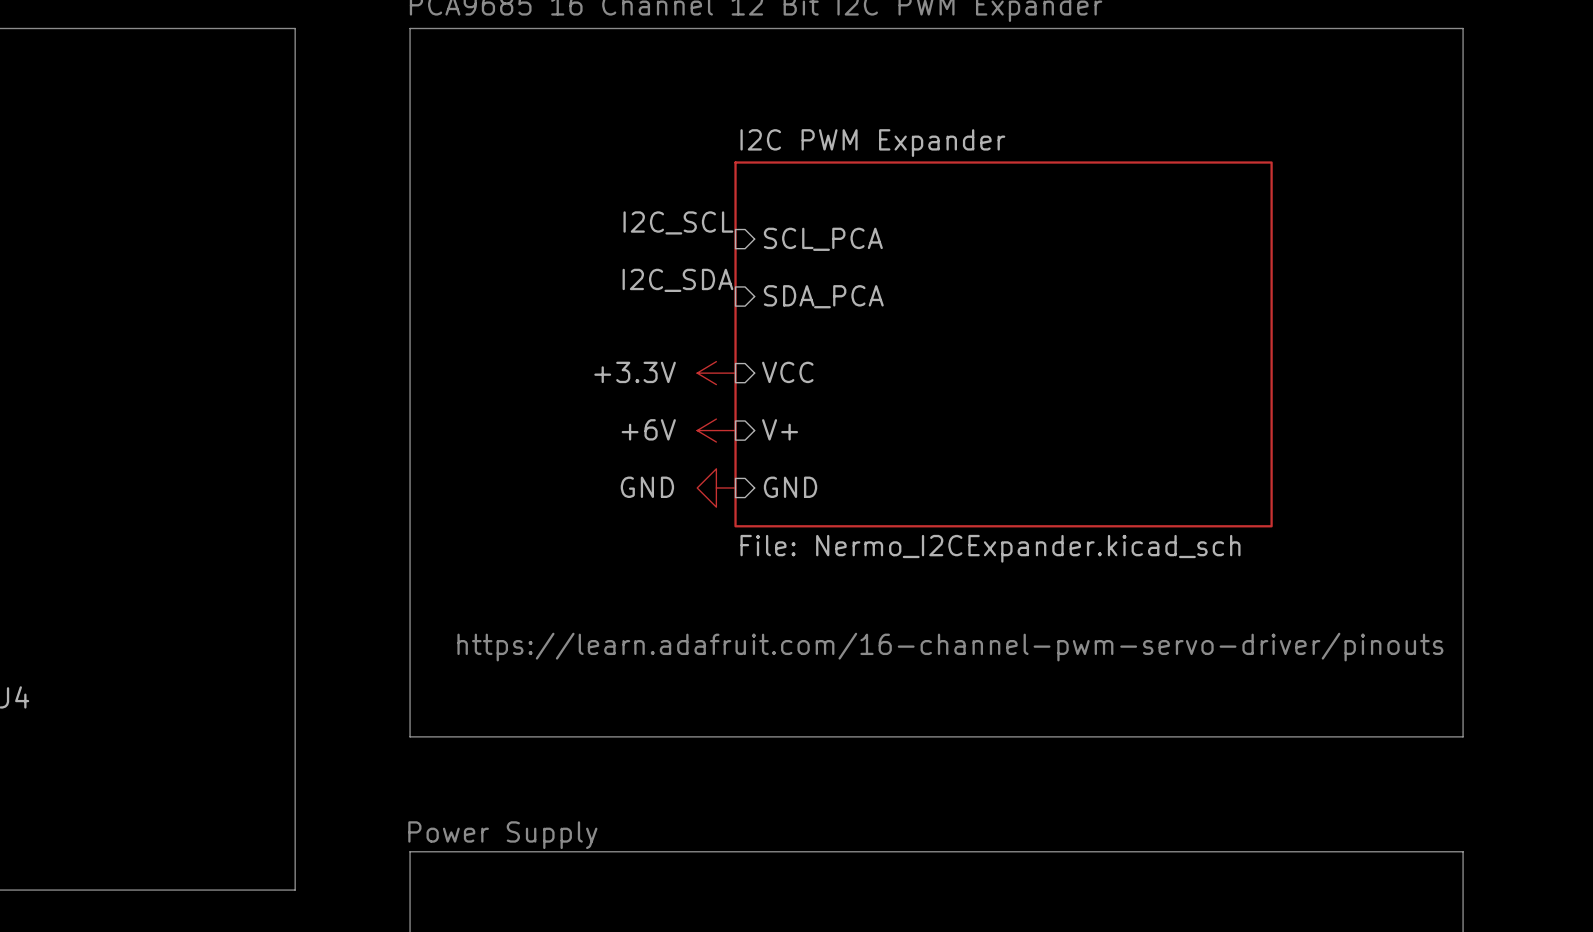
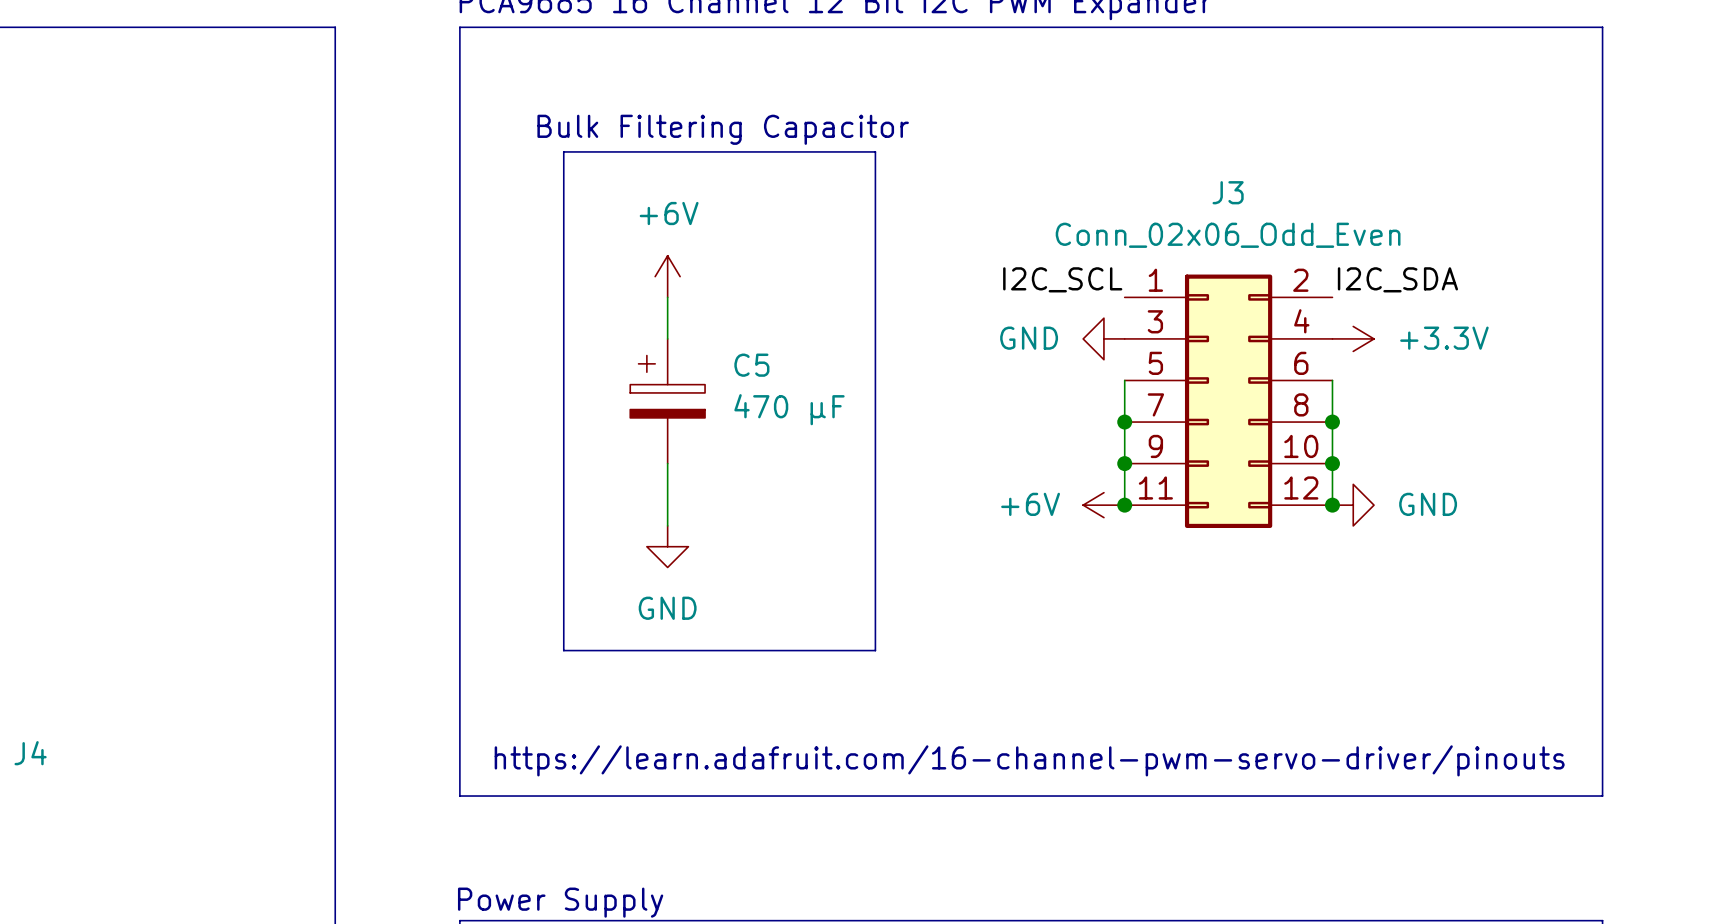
text: none -> Bulk Filtering Capacitor (723, 129)
line: none -> (563, 151) (875, 151) (875, 650) (563, 650) (563, 151)
label position: I2C_SCL (678, 222) -> I2C_SCL (1062, 279)
sheet pin: SCL_PCA (823, 239) -> none
power symbol: none -> +6V (667, 276)
label: none -> I2C_SDA (1397, 279)
wire: none -> (667, 297) (667, 338)
label: I2C_SDA (677, 280) -> none
sheet pin: SDA_PCA (823, 296) -> none
power symbol: none -> GND (1103, 338)
power symbol: none -> +3.3V (1353, 338)
sheet I2C PWM Expander: File: Nermo_I2CExpander.kicad_sch (1003, 344) -> none
wire: none -> (1124, 380) (1124, 505)
wire: none -> (1332, 380) (1332, 505)
sheet pin: VCC (787, 372) -> none
C5: none -> 470 µF (667, 401)
power symbol: +3.3V (716, 373) -> none
J3: none -> Conn_02x06_Odd_Even (1228, 401)
junction: none -> (1124, 422)
junction: none -> (1332, 422)
sheet pin: V+ (780, 429) -> none
wire: none -> (667, 463) (667, 525)
power symbol: +6V (716, 430) -> none
junction: none -> (1124, 463)
junction: none -> (1332, 463)
power symbol: none -> +6V (1103, 505)
junction: none -> (1124, 505)
junction: none -> (1332, 505)
power symbol: none -> GND (1353, 505)
power symbol rotation: 0° (716, 487) -> 90° counterclockwise (667, 546)
power symbol position: GND (716, 487) -> GND (667, 546)
sheet pin: GND (790, 487) -> none
text position: https://learn.adafruit.com/16-channel-pwm-servo-driver/pinouts (950, 647) -> https://learn.adafruit.com/16-channel-pwm-servo-driver/pinouts (1029, 760)

